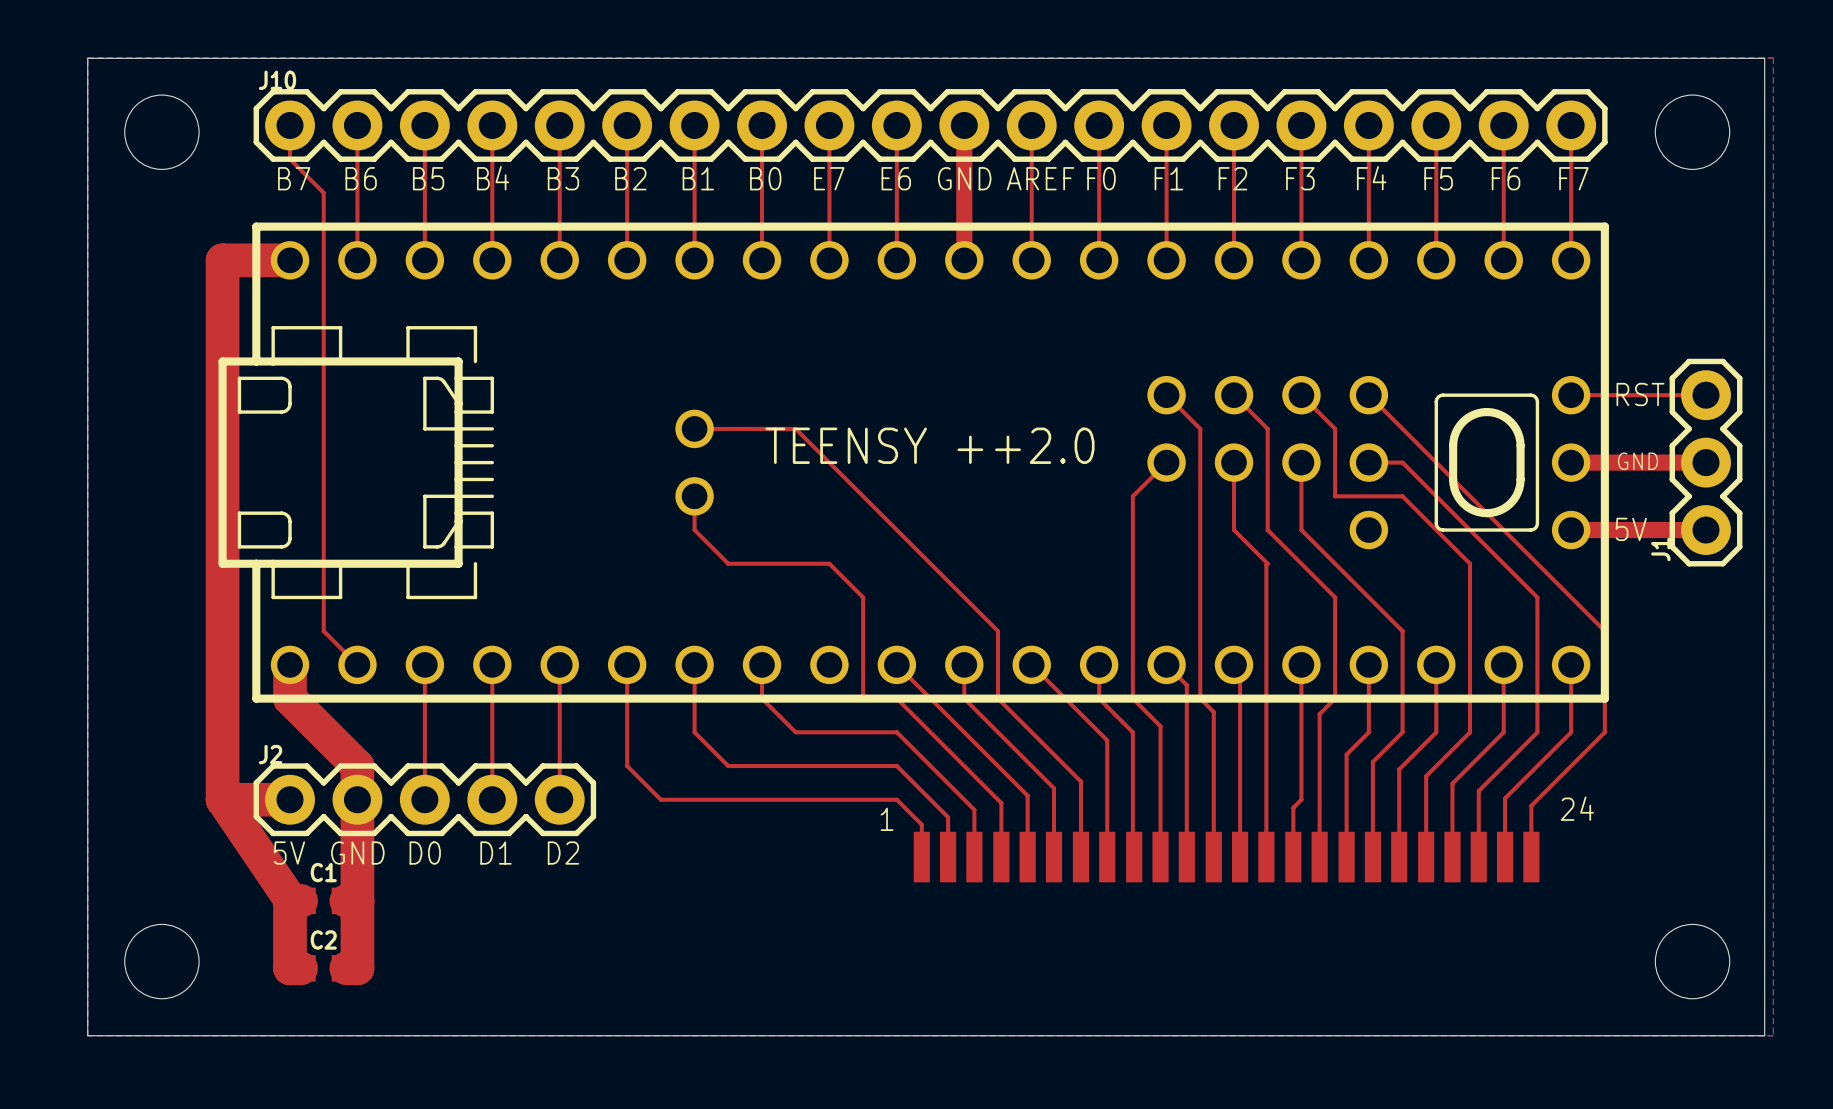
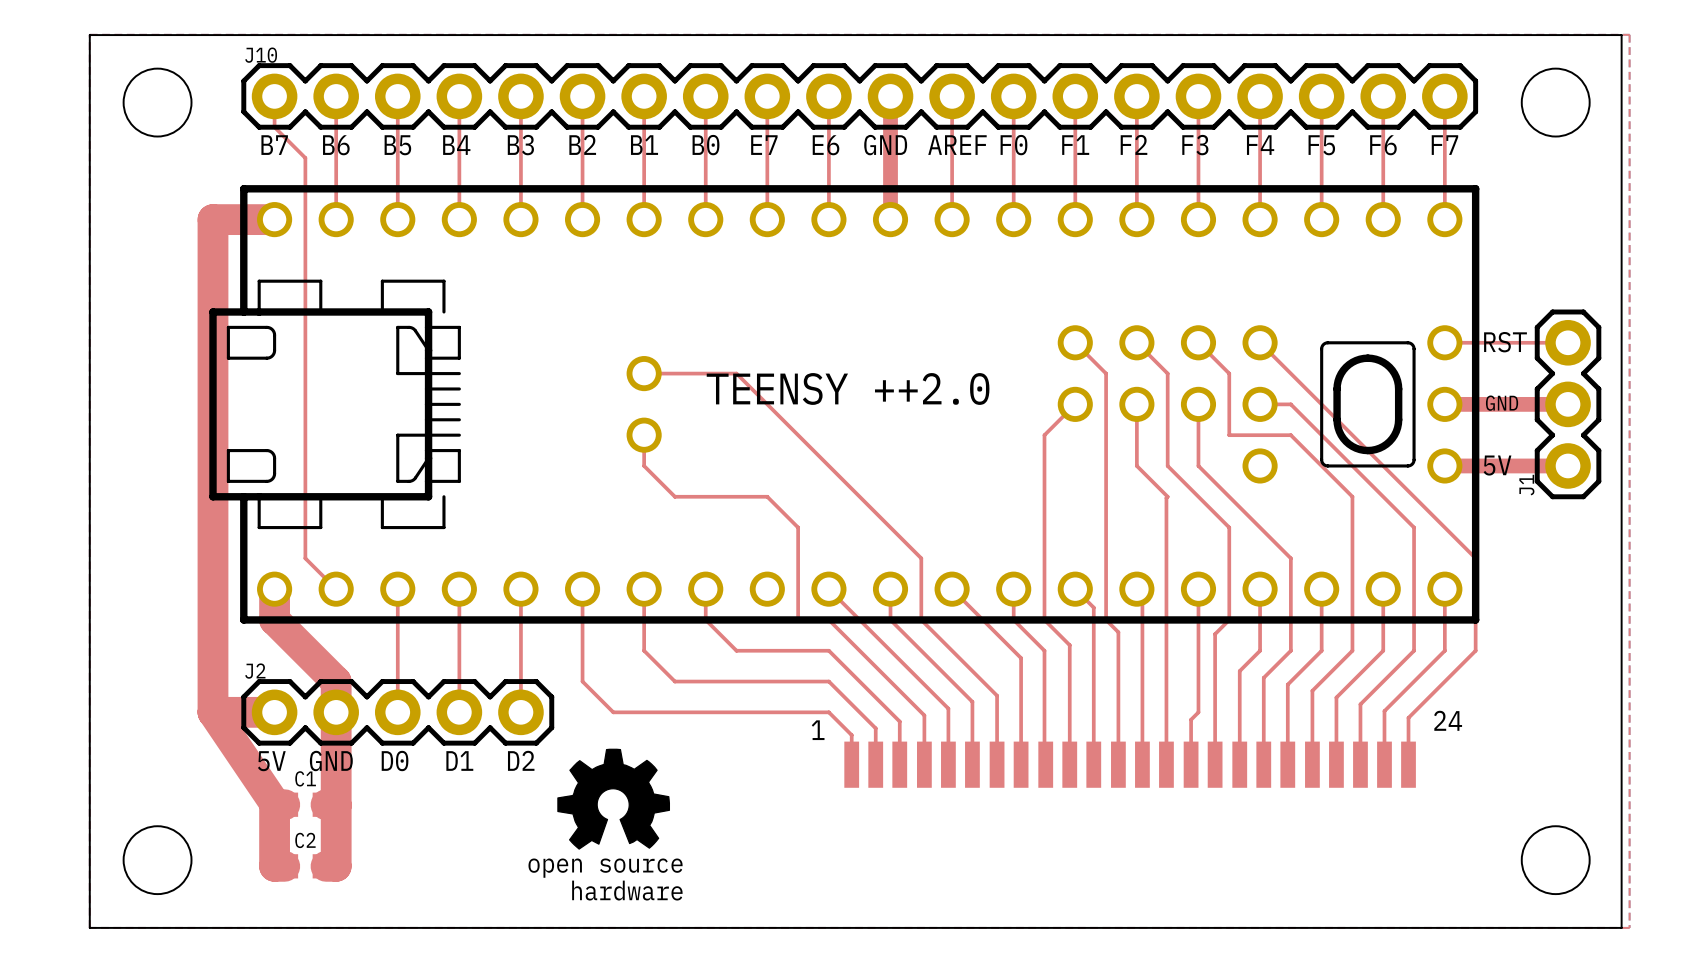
drawing: none -> [557, 748, 671, 850]

